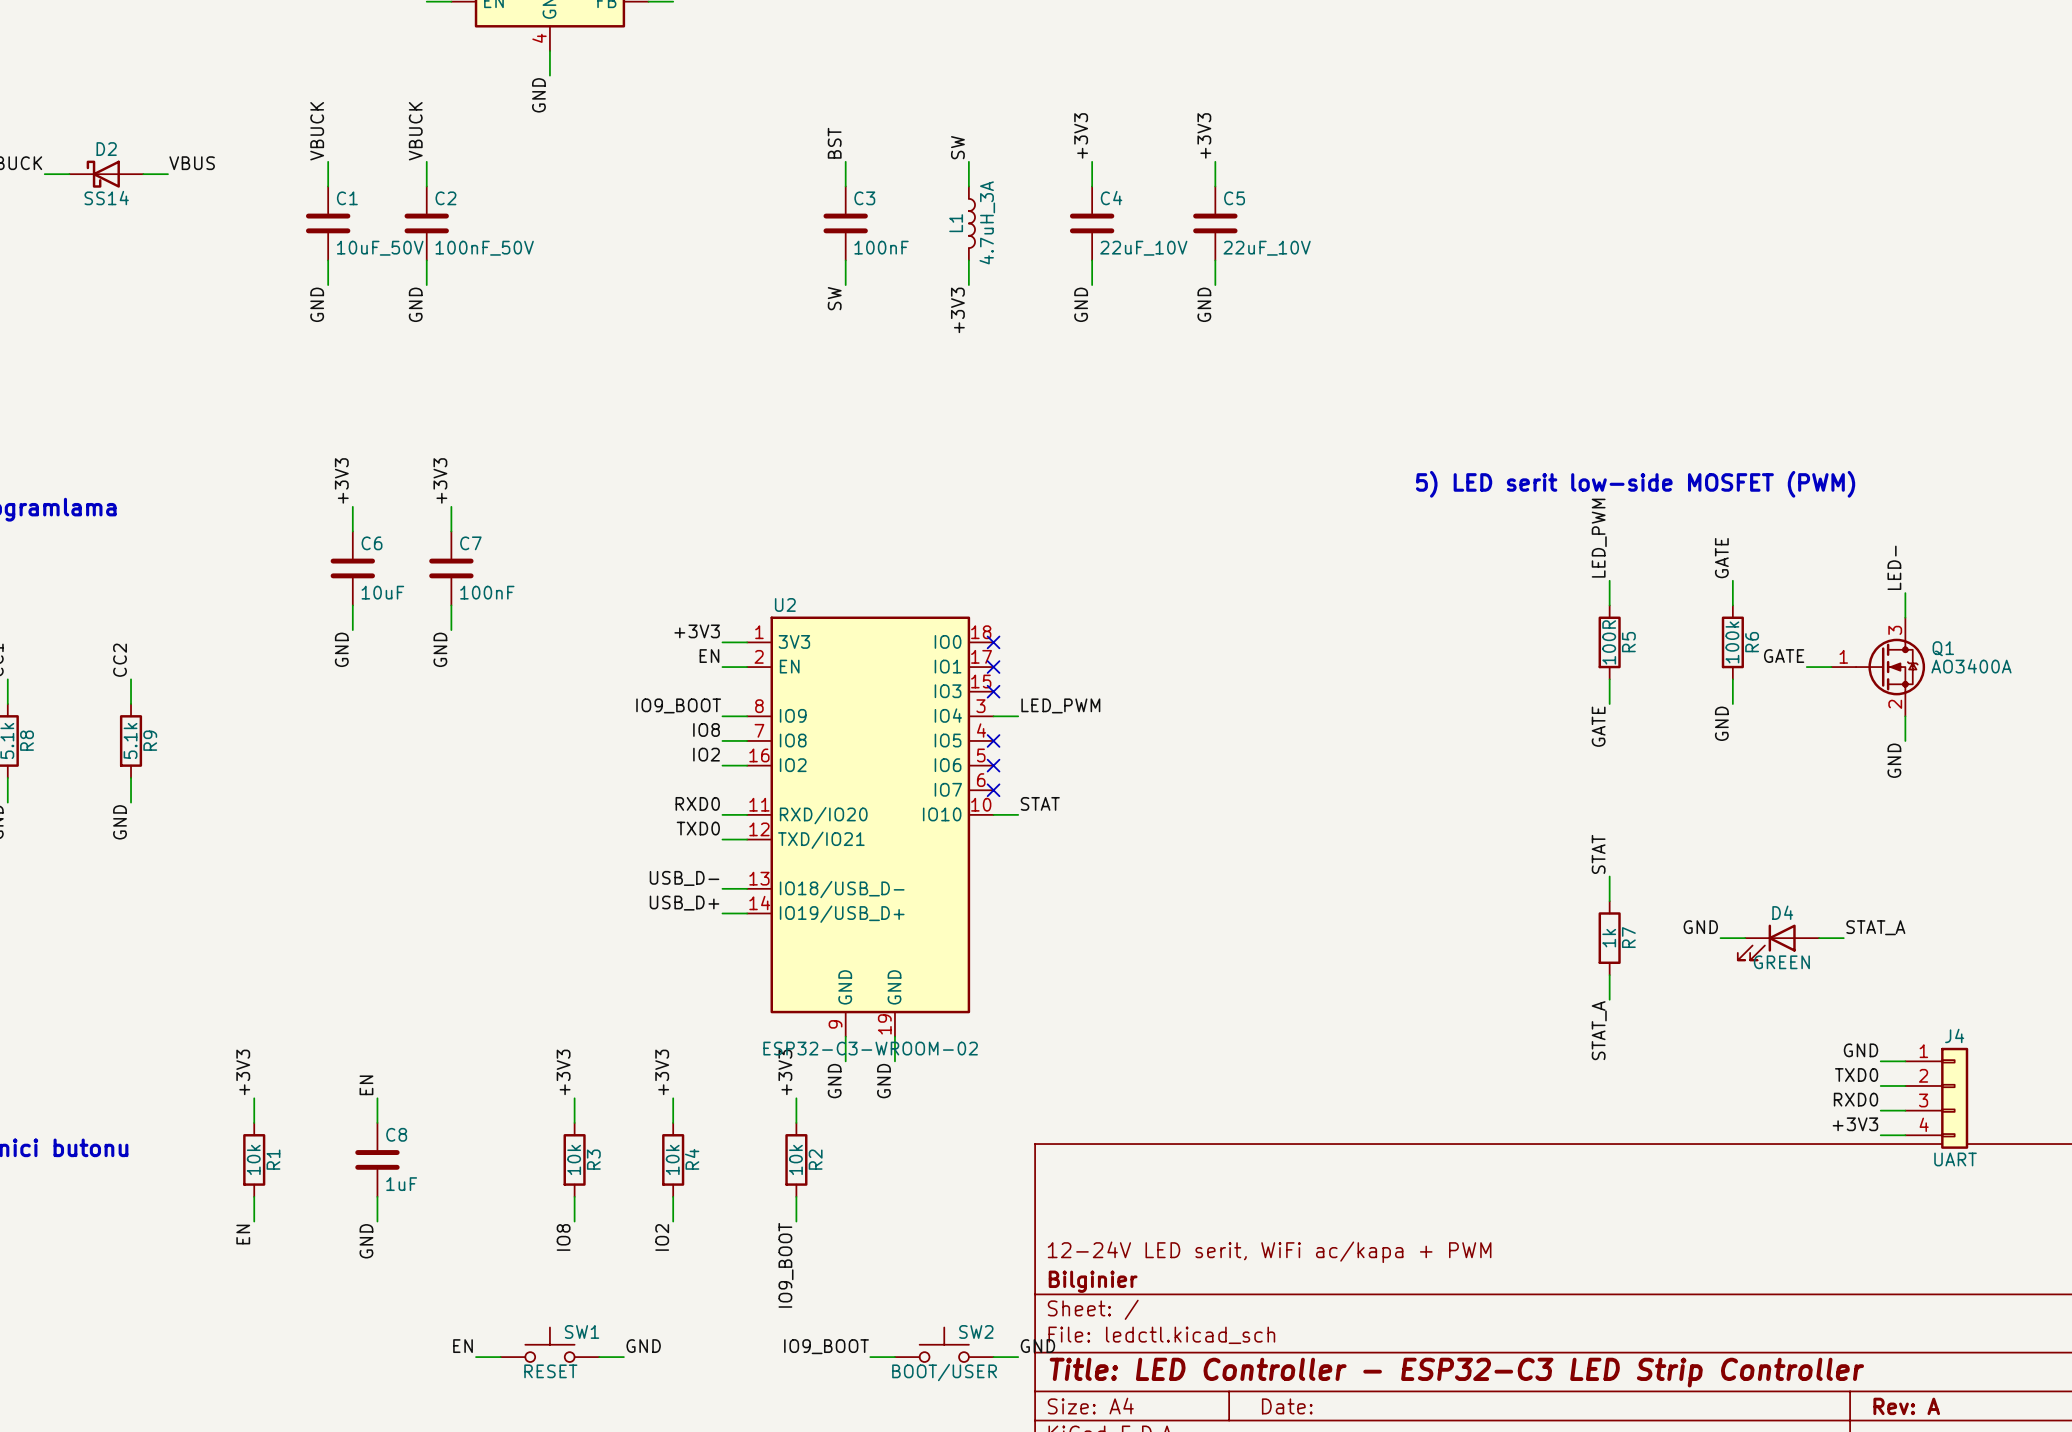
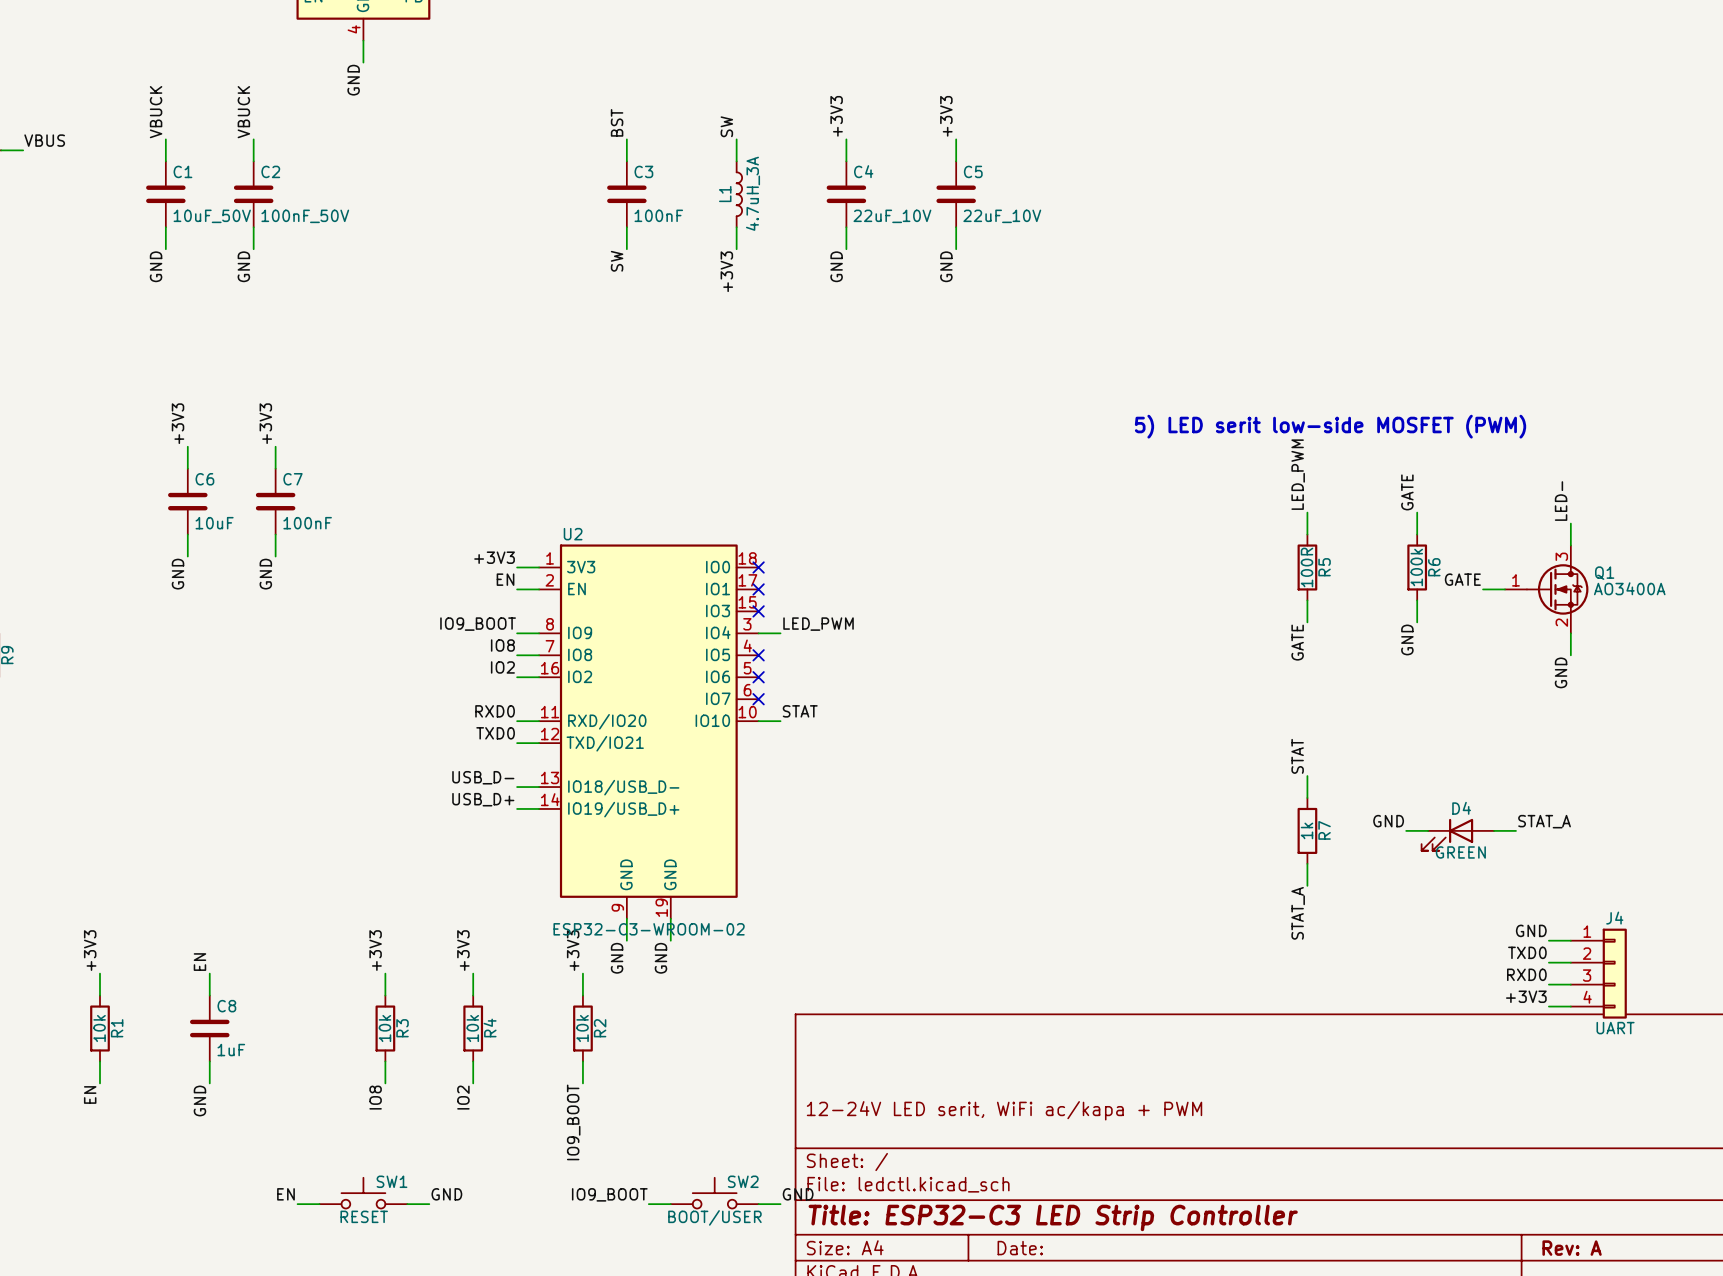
title block: Bilginier (1093, 1281) -> none
title block: Title: LED Controller - ESP32-C3 LED Strip Controller (1456, 1372) -> Title: ESP32-C3 LED Strip Controller (1053, 1217)

